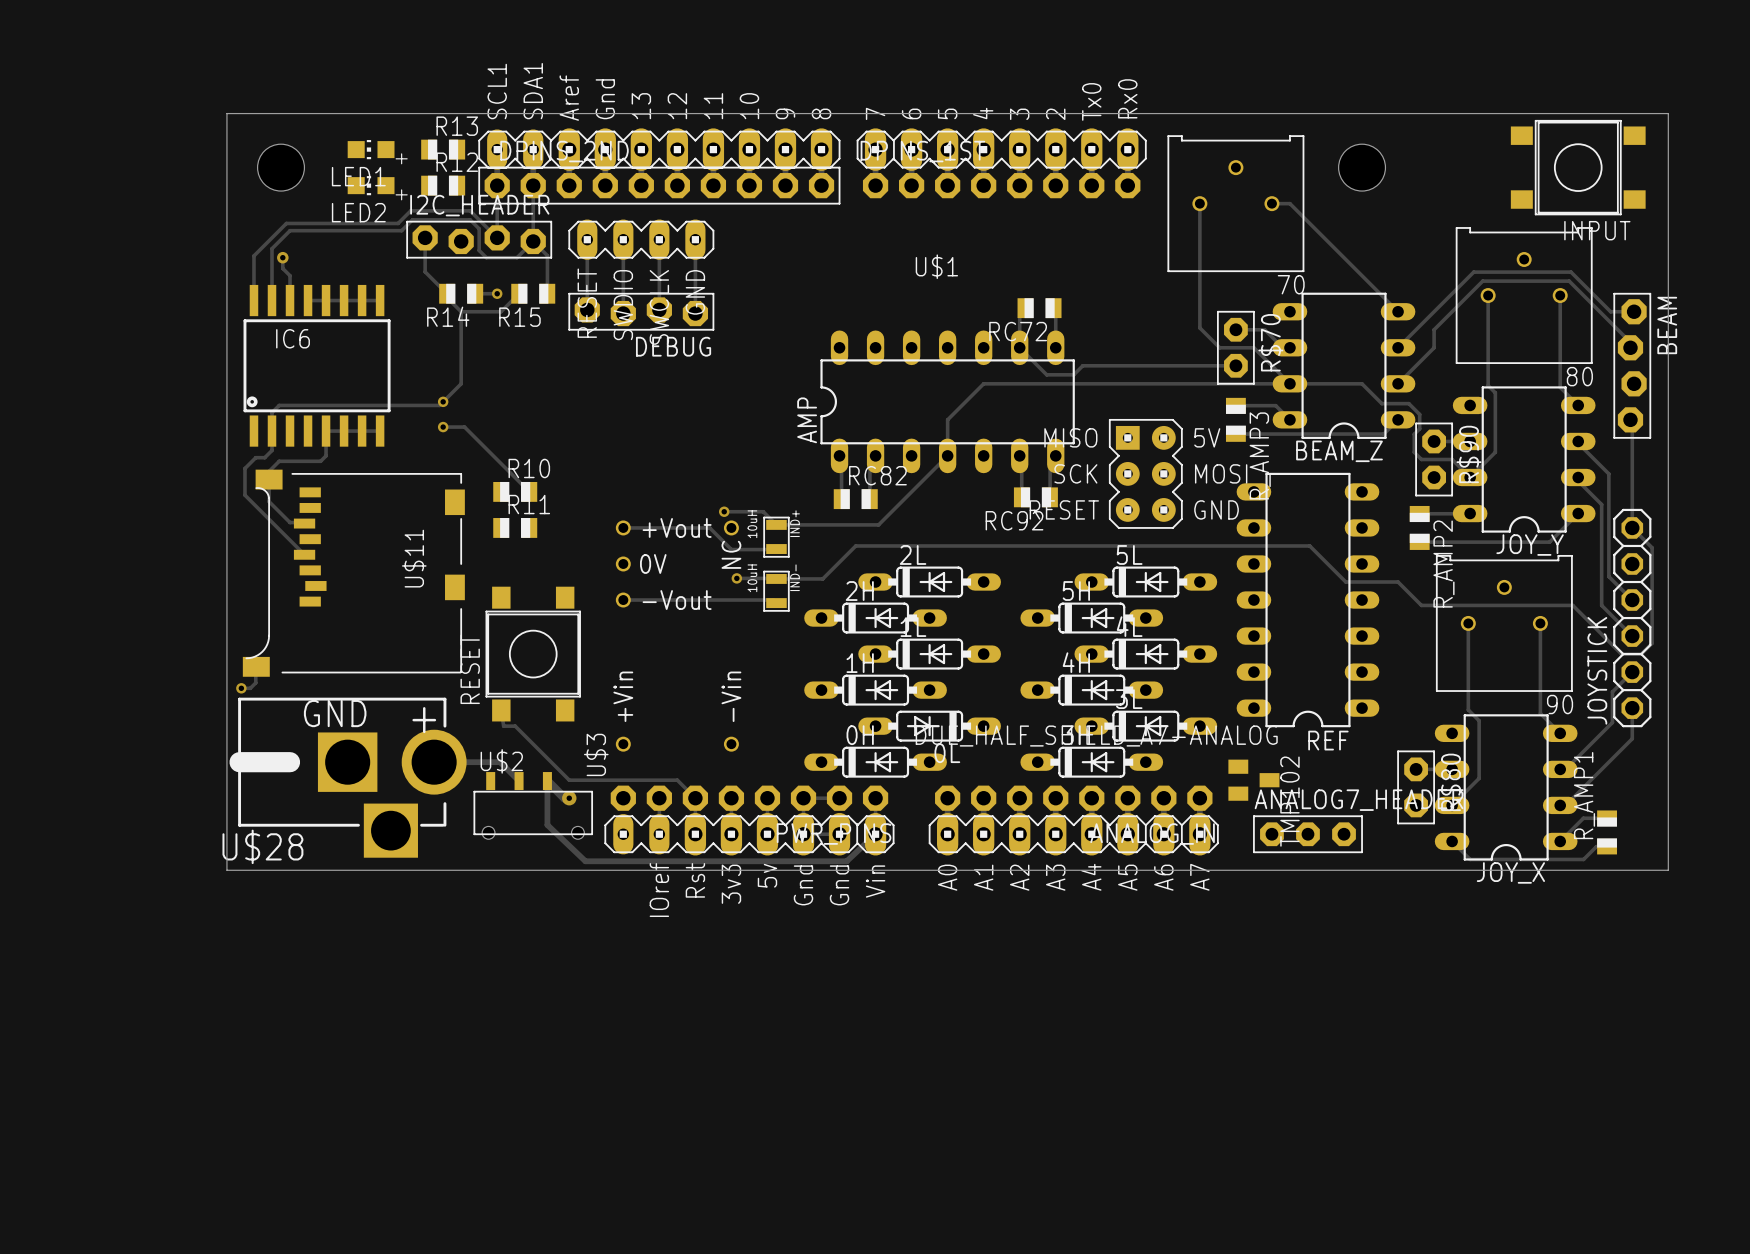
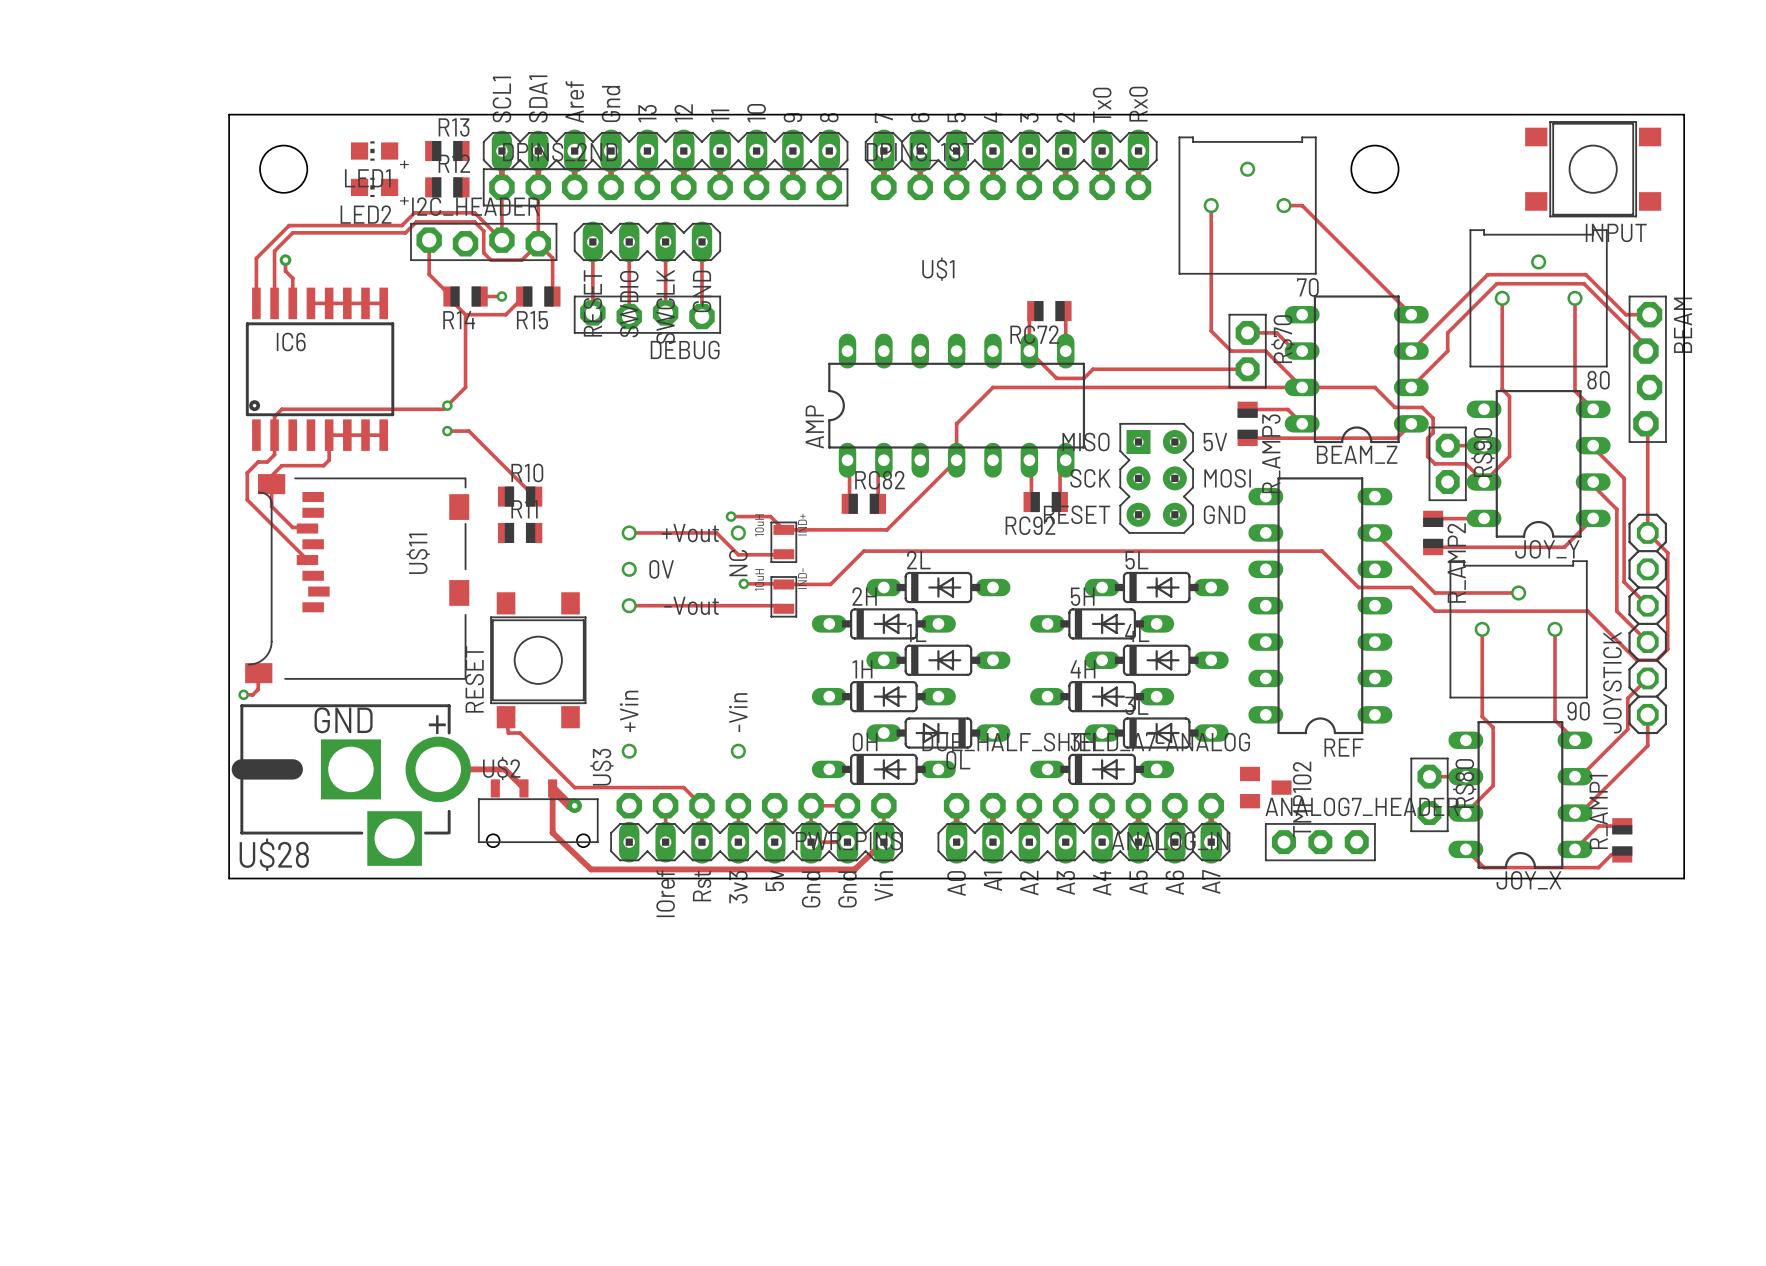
track: none -> (1374, 532) (1434, 592) (1518, 592)

